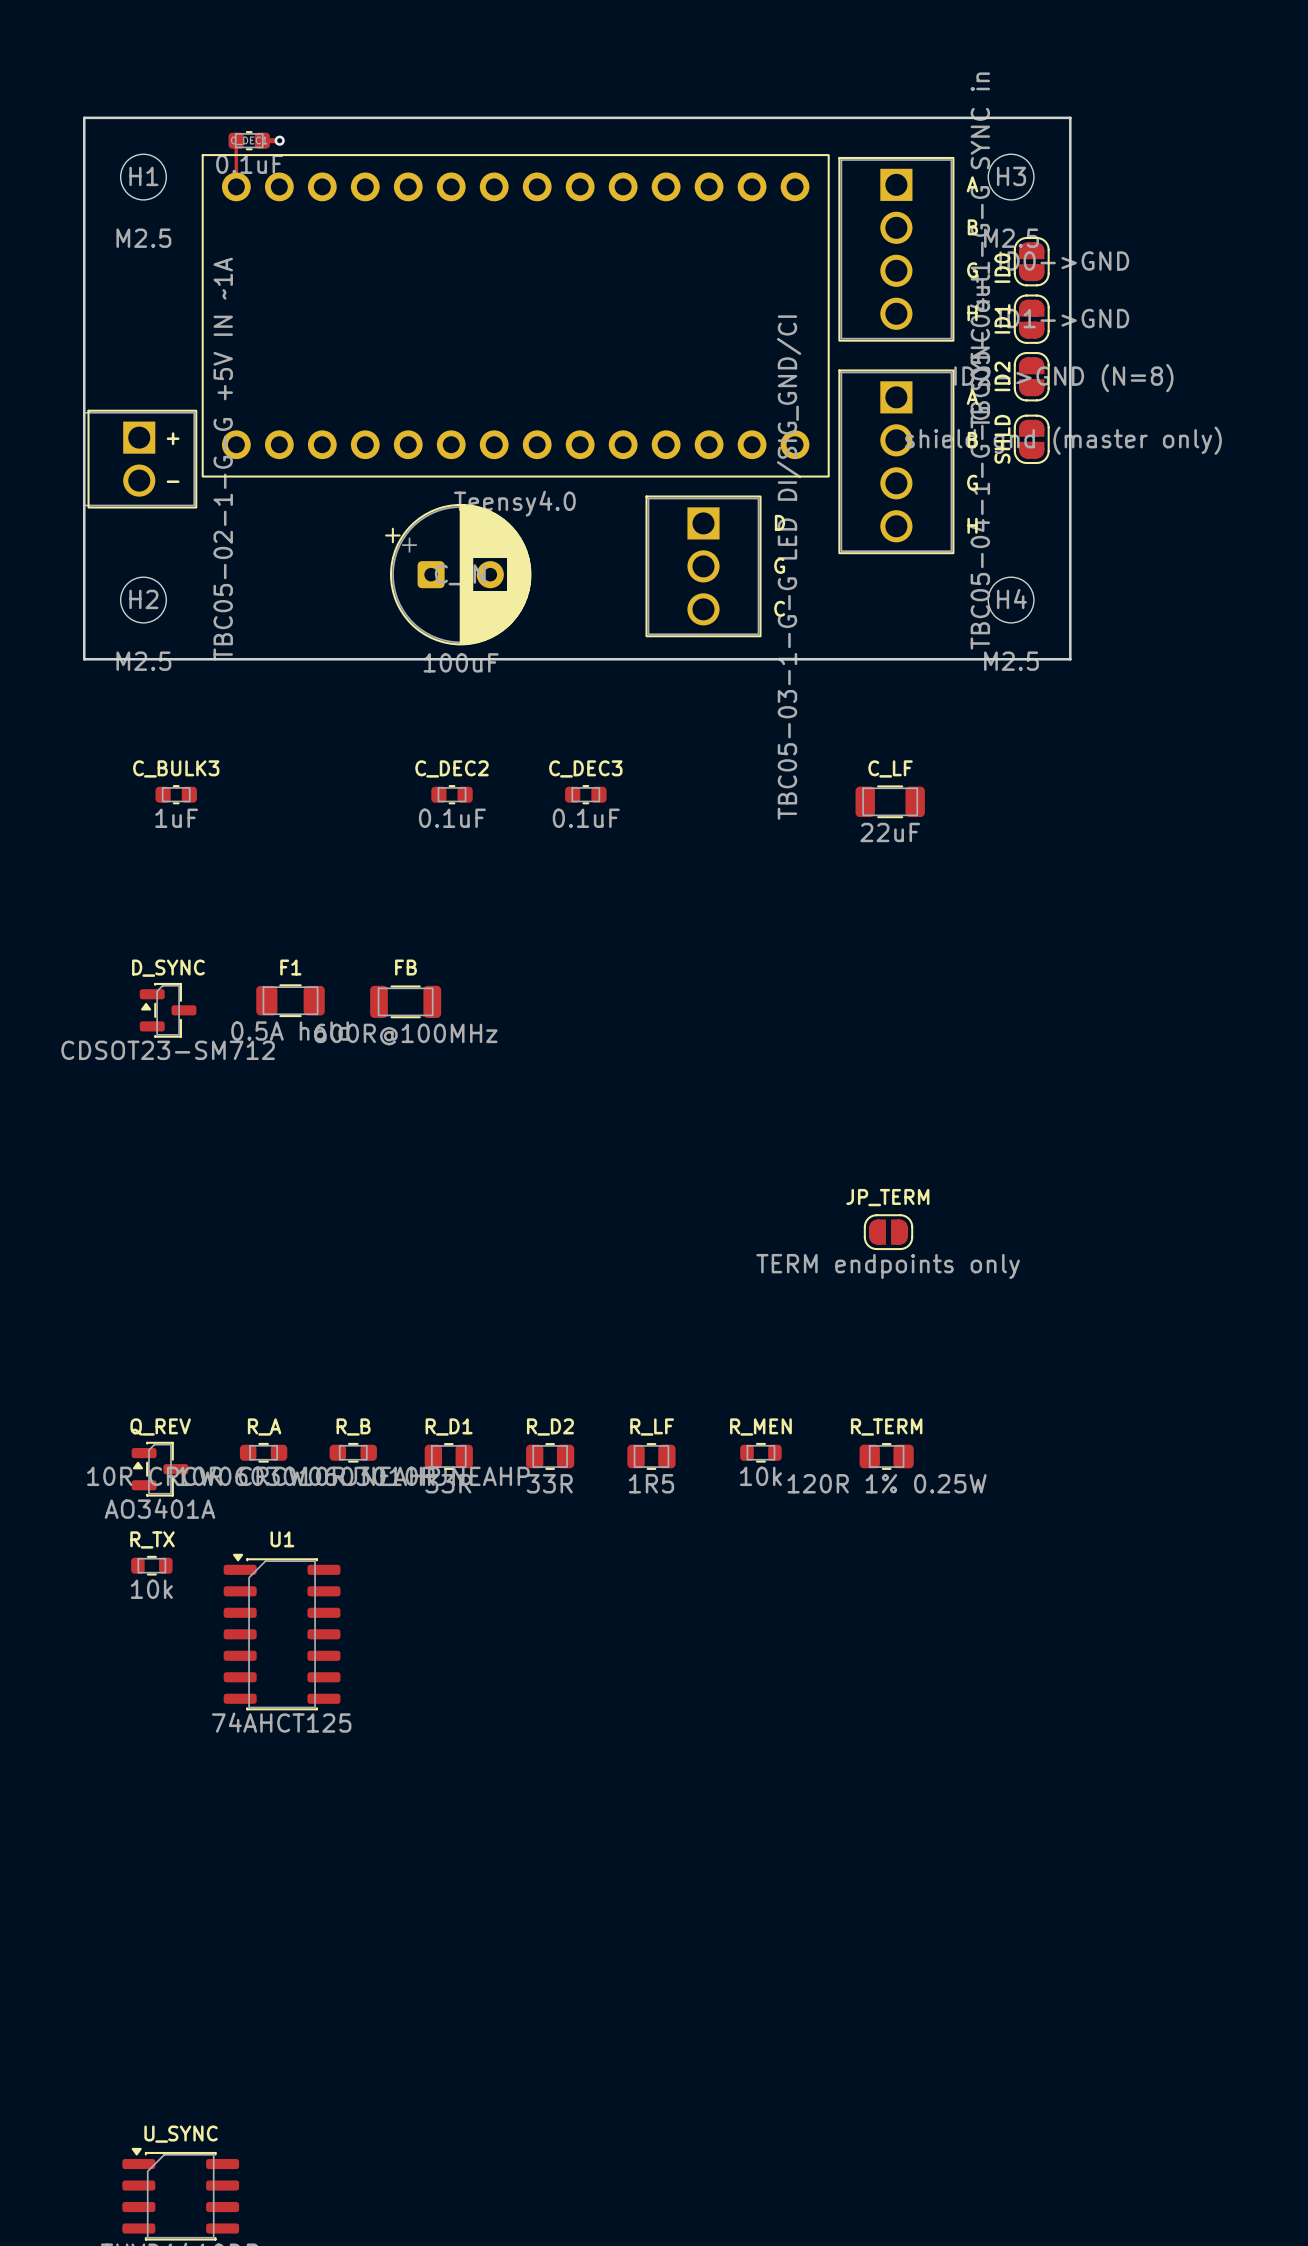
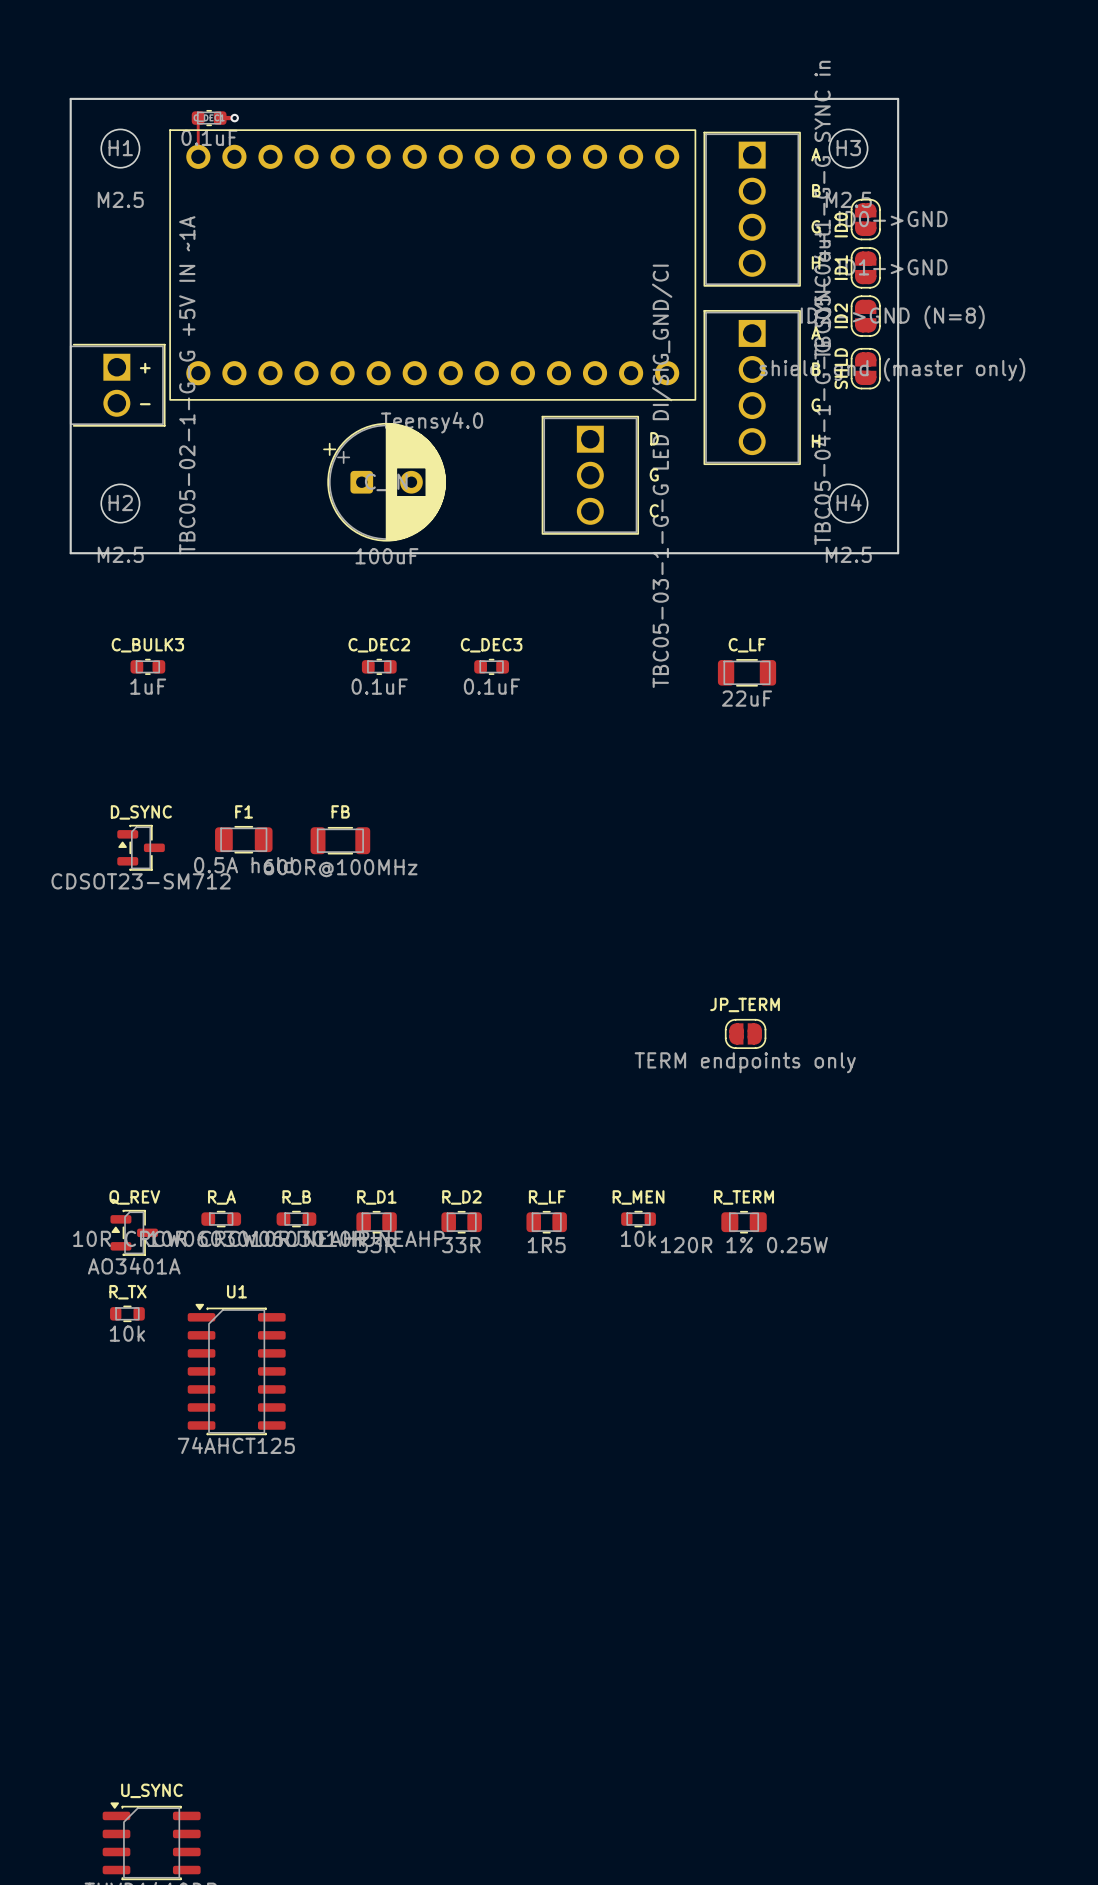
part footprint: [83, 409, 198, 509] -> [70, 343, 166, 427]

